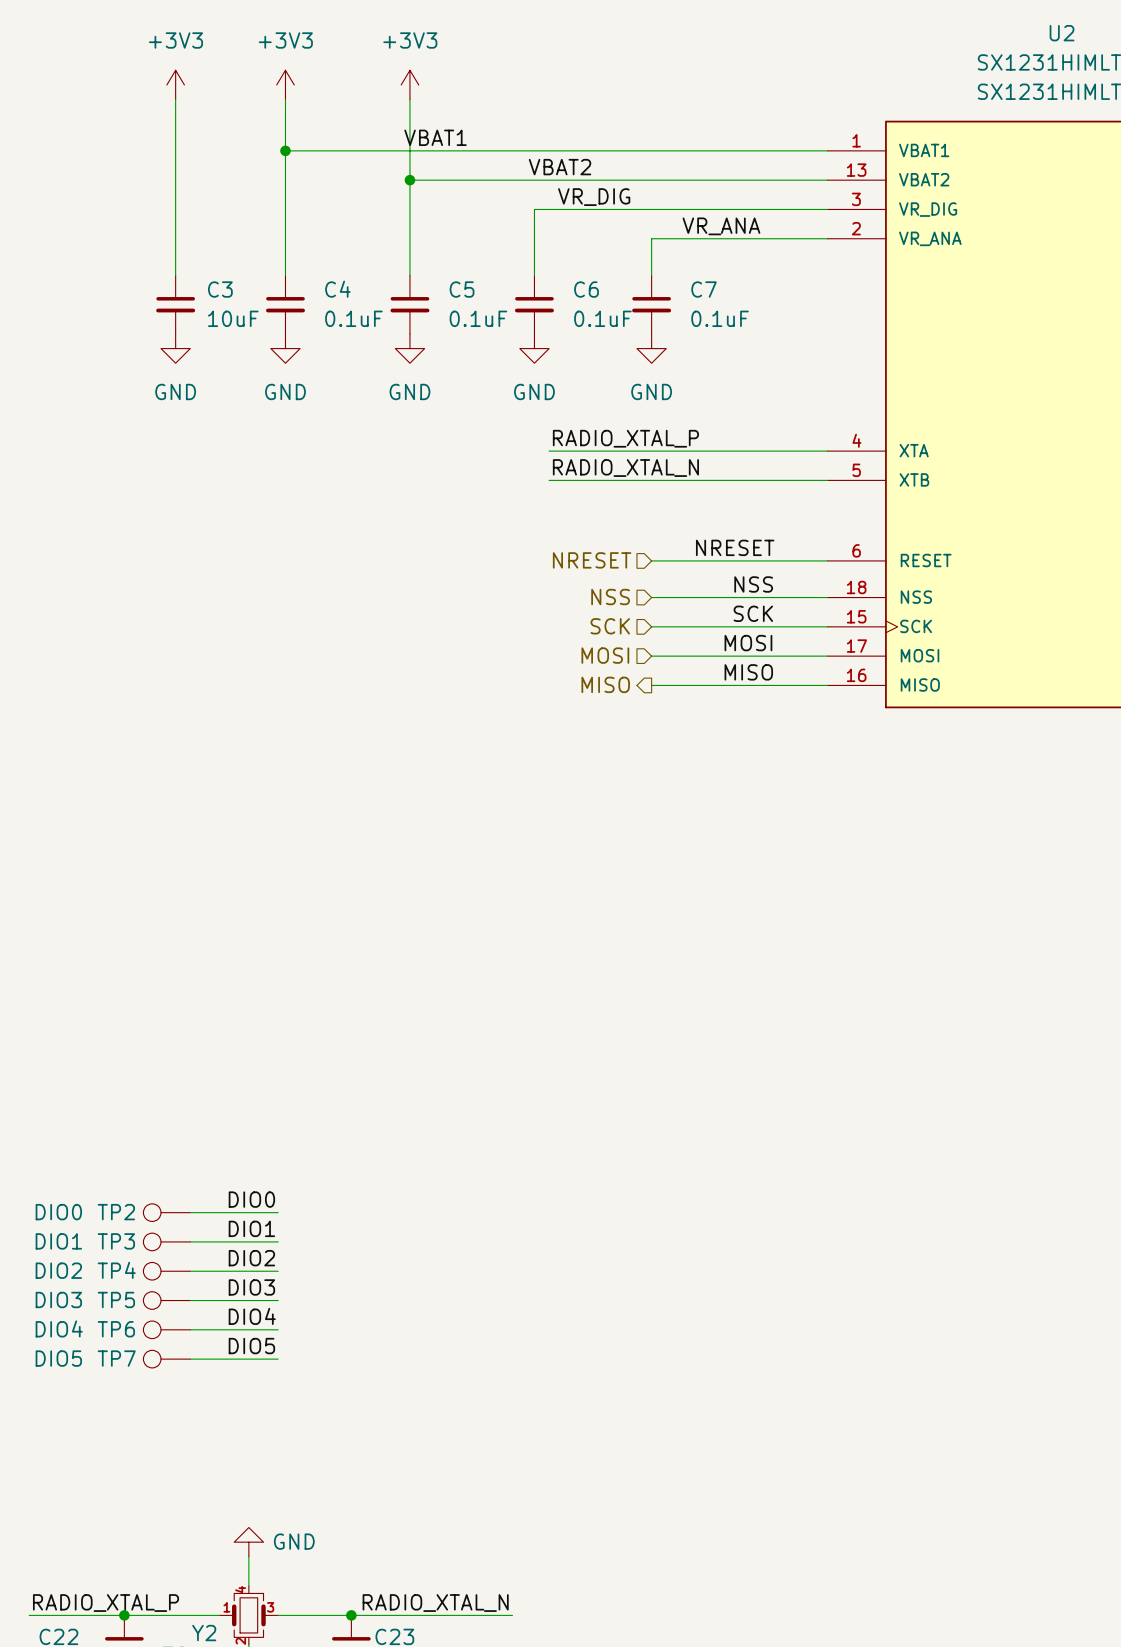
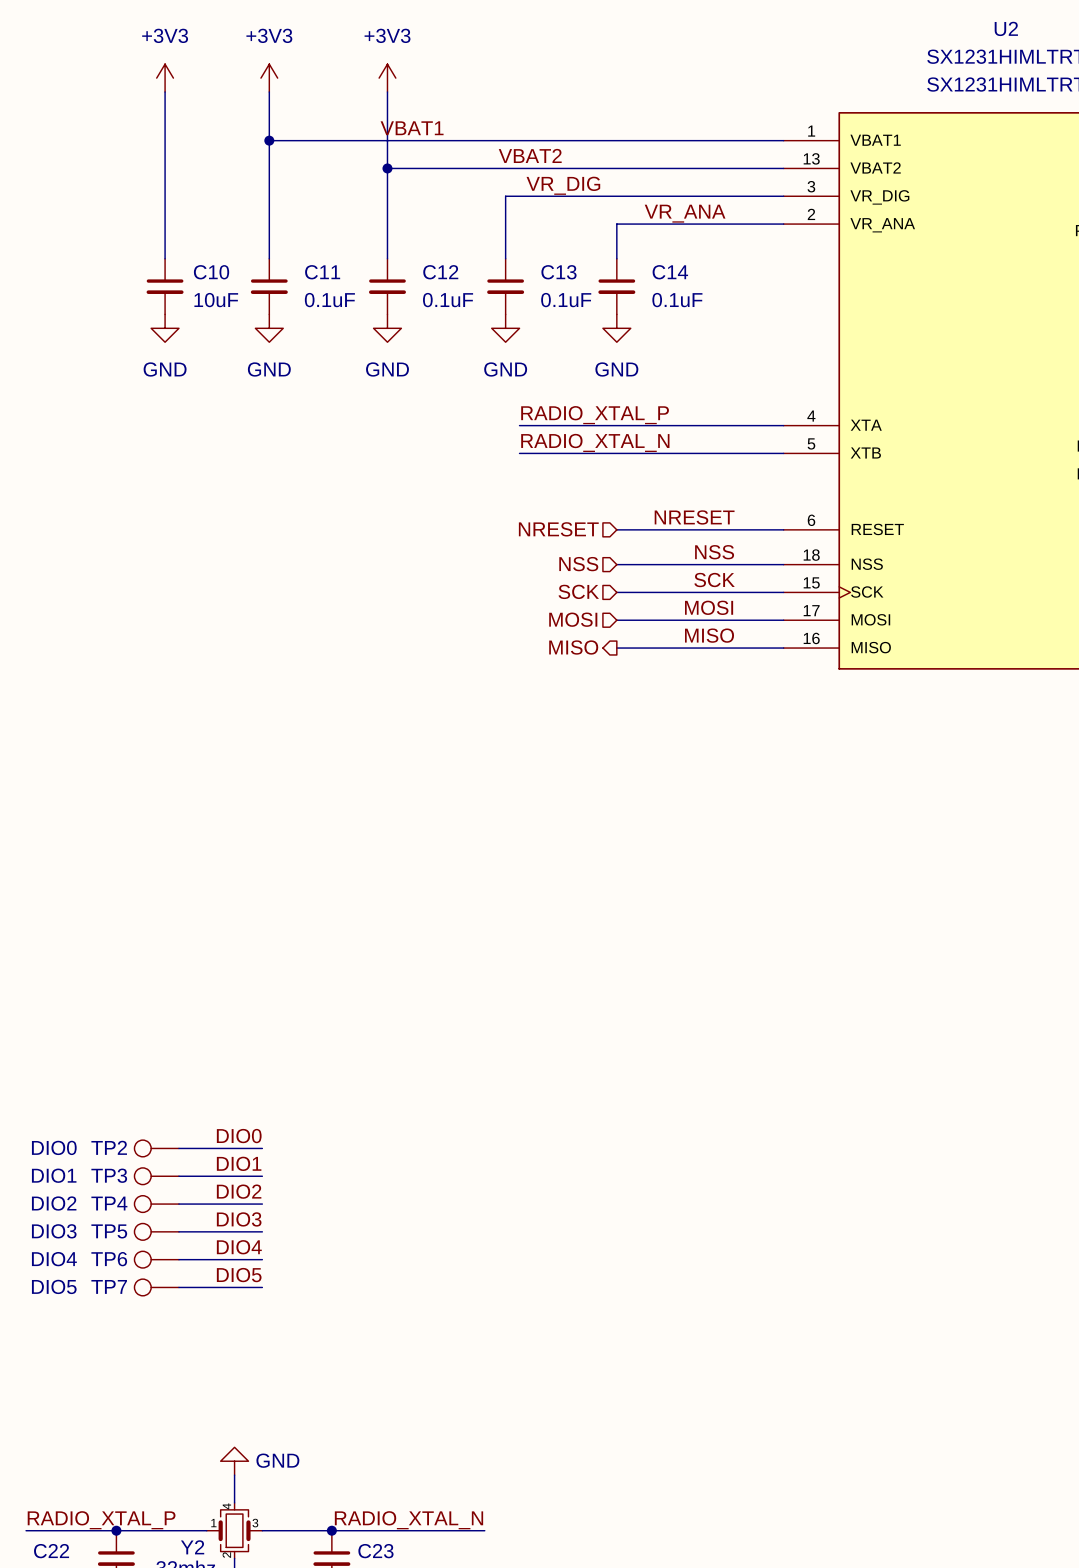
C3 name: C3 (220, 289) -> C10 (211, 272)
C4 name: C4 (337, 289) -> C11 (322, 272)
C5 name: C5 (462, 289) -> C12 (440, 272)
C6 name: C6 (586, 289) -> C13 (558, 272)
C7 name: C7 (704, 289) -> C14 (670, 272)

